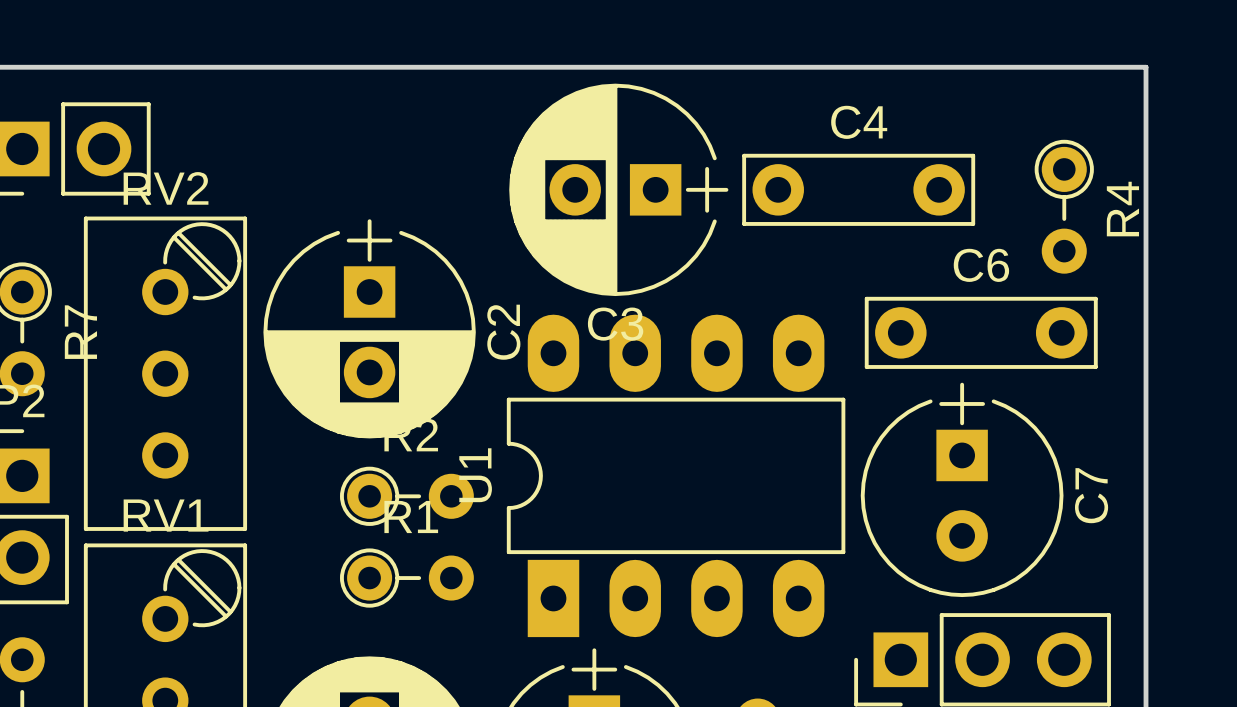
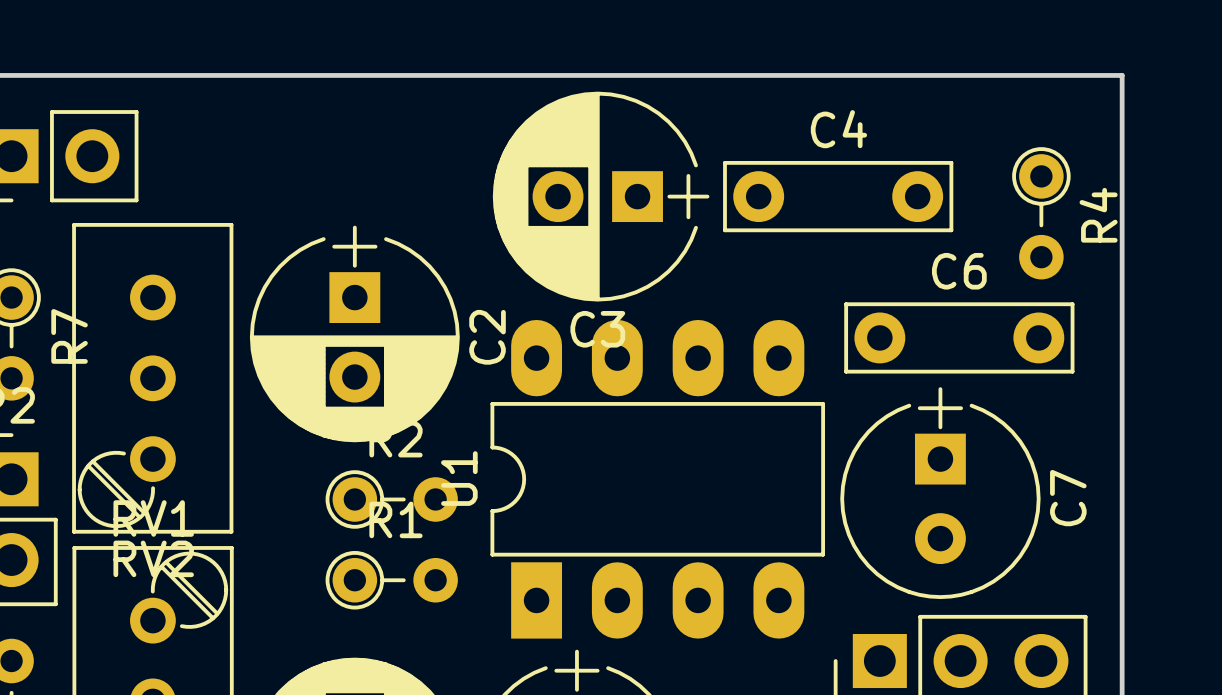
RV2 rotation: 0° (165, 373) -> 180° (152, 378)

